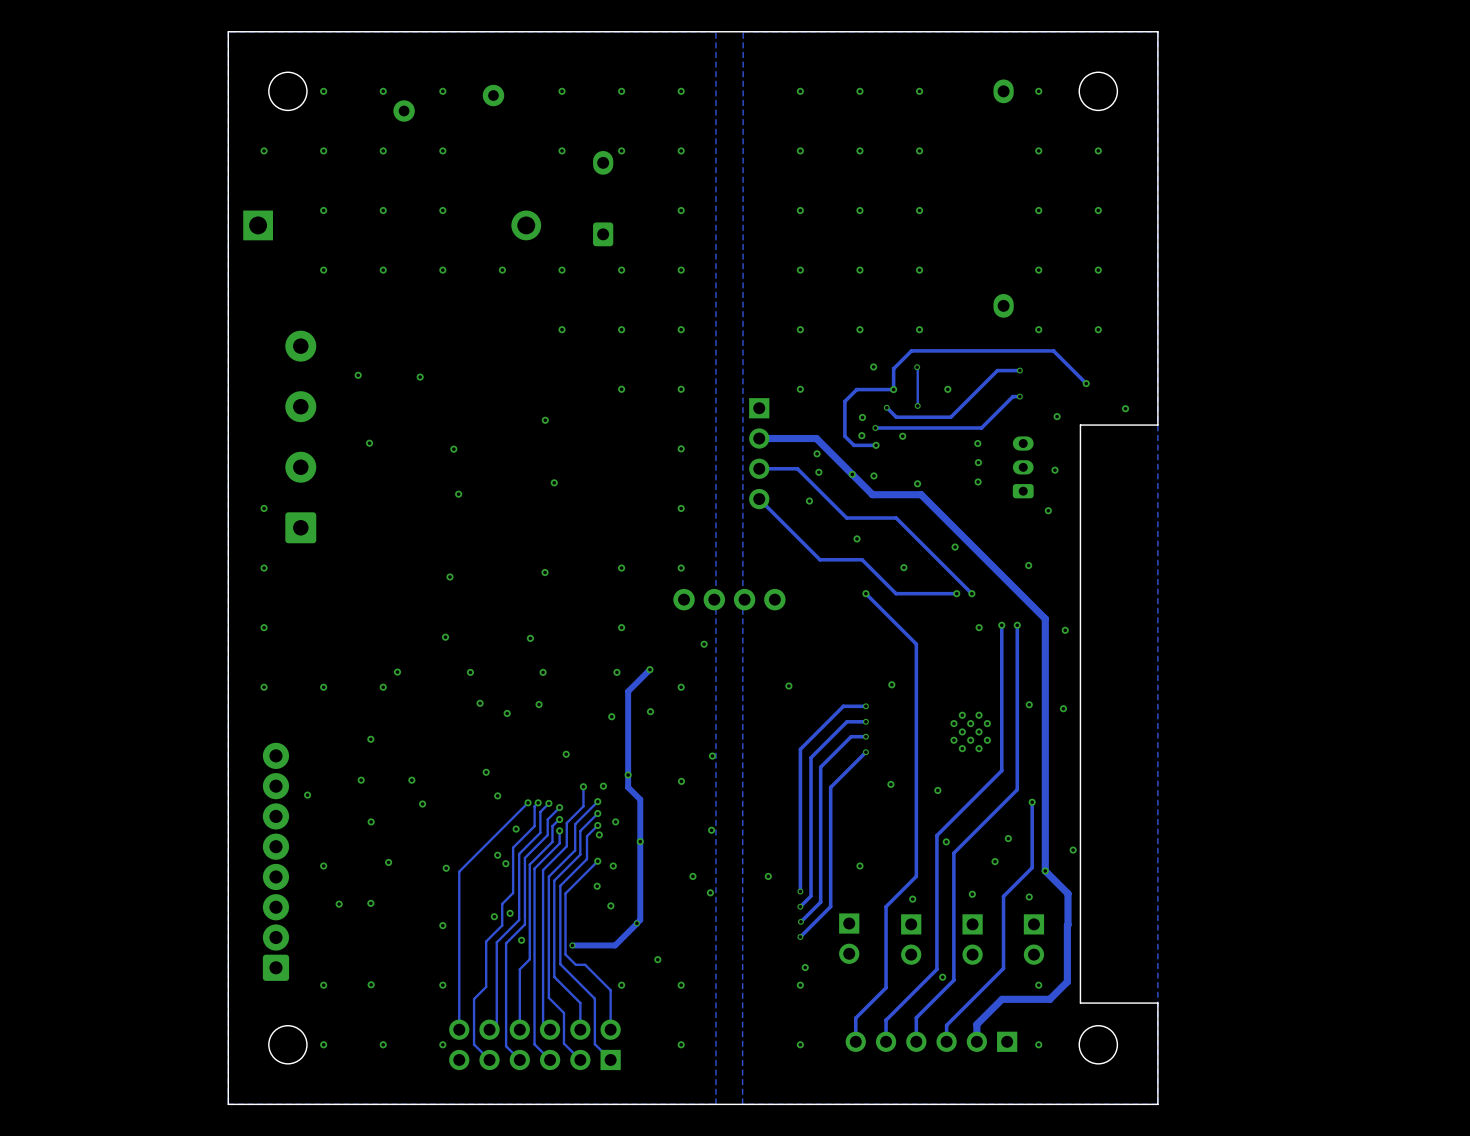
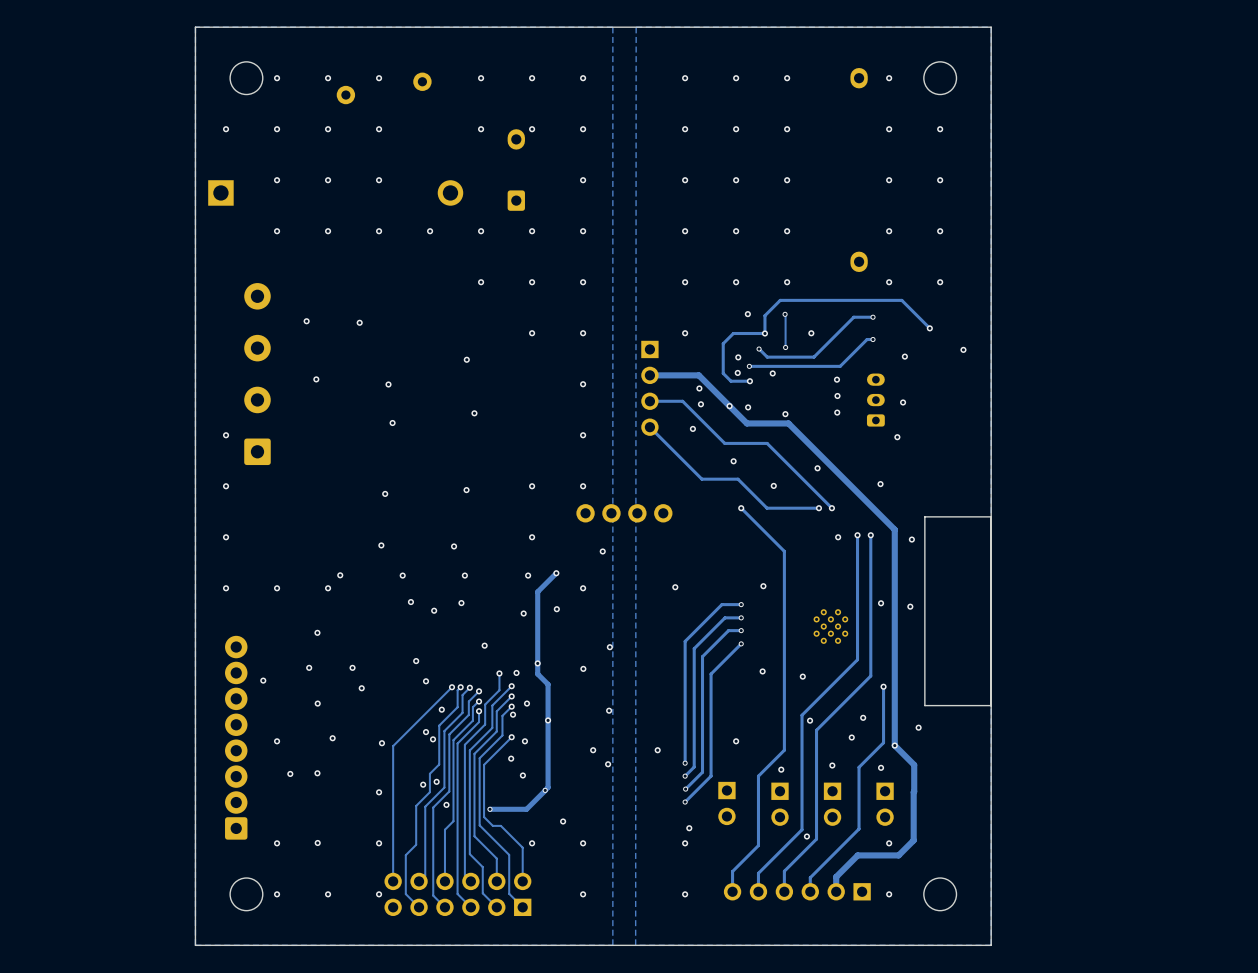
board edge: (1157, 425) (1080, 425) (1080, 603) -> (991, 516) (924, 516)
board edge: none -> (991, 363) (991, 858)
board edge: (1080, 824) (1080, 1003) (1157, 1003) -> (924, 705) (991, 705)

